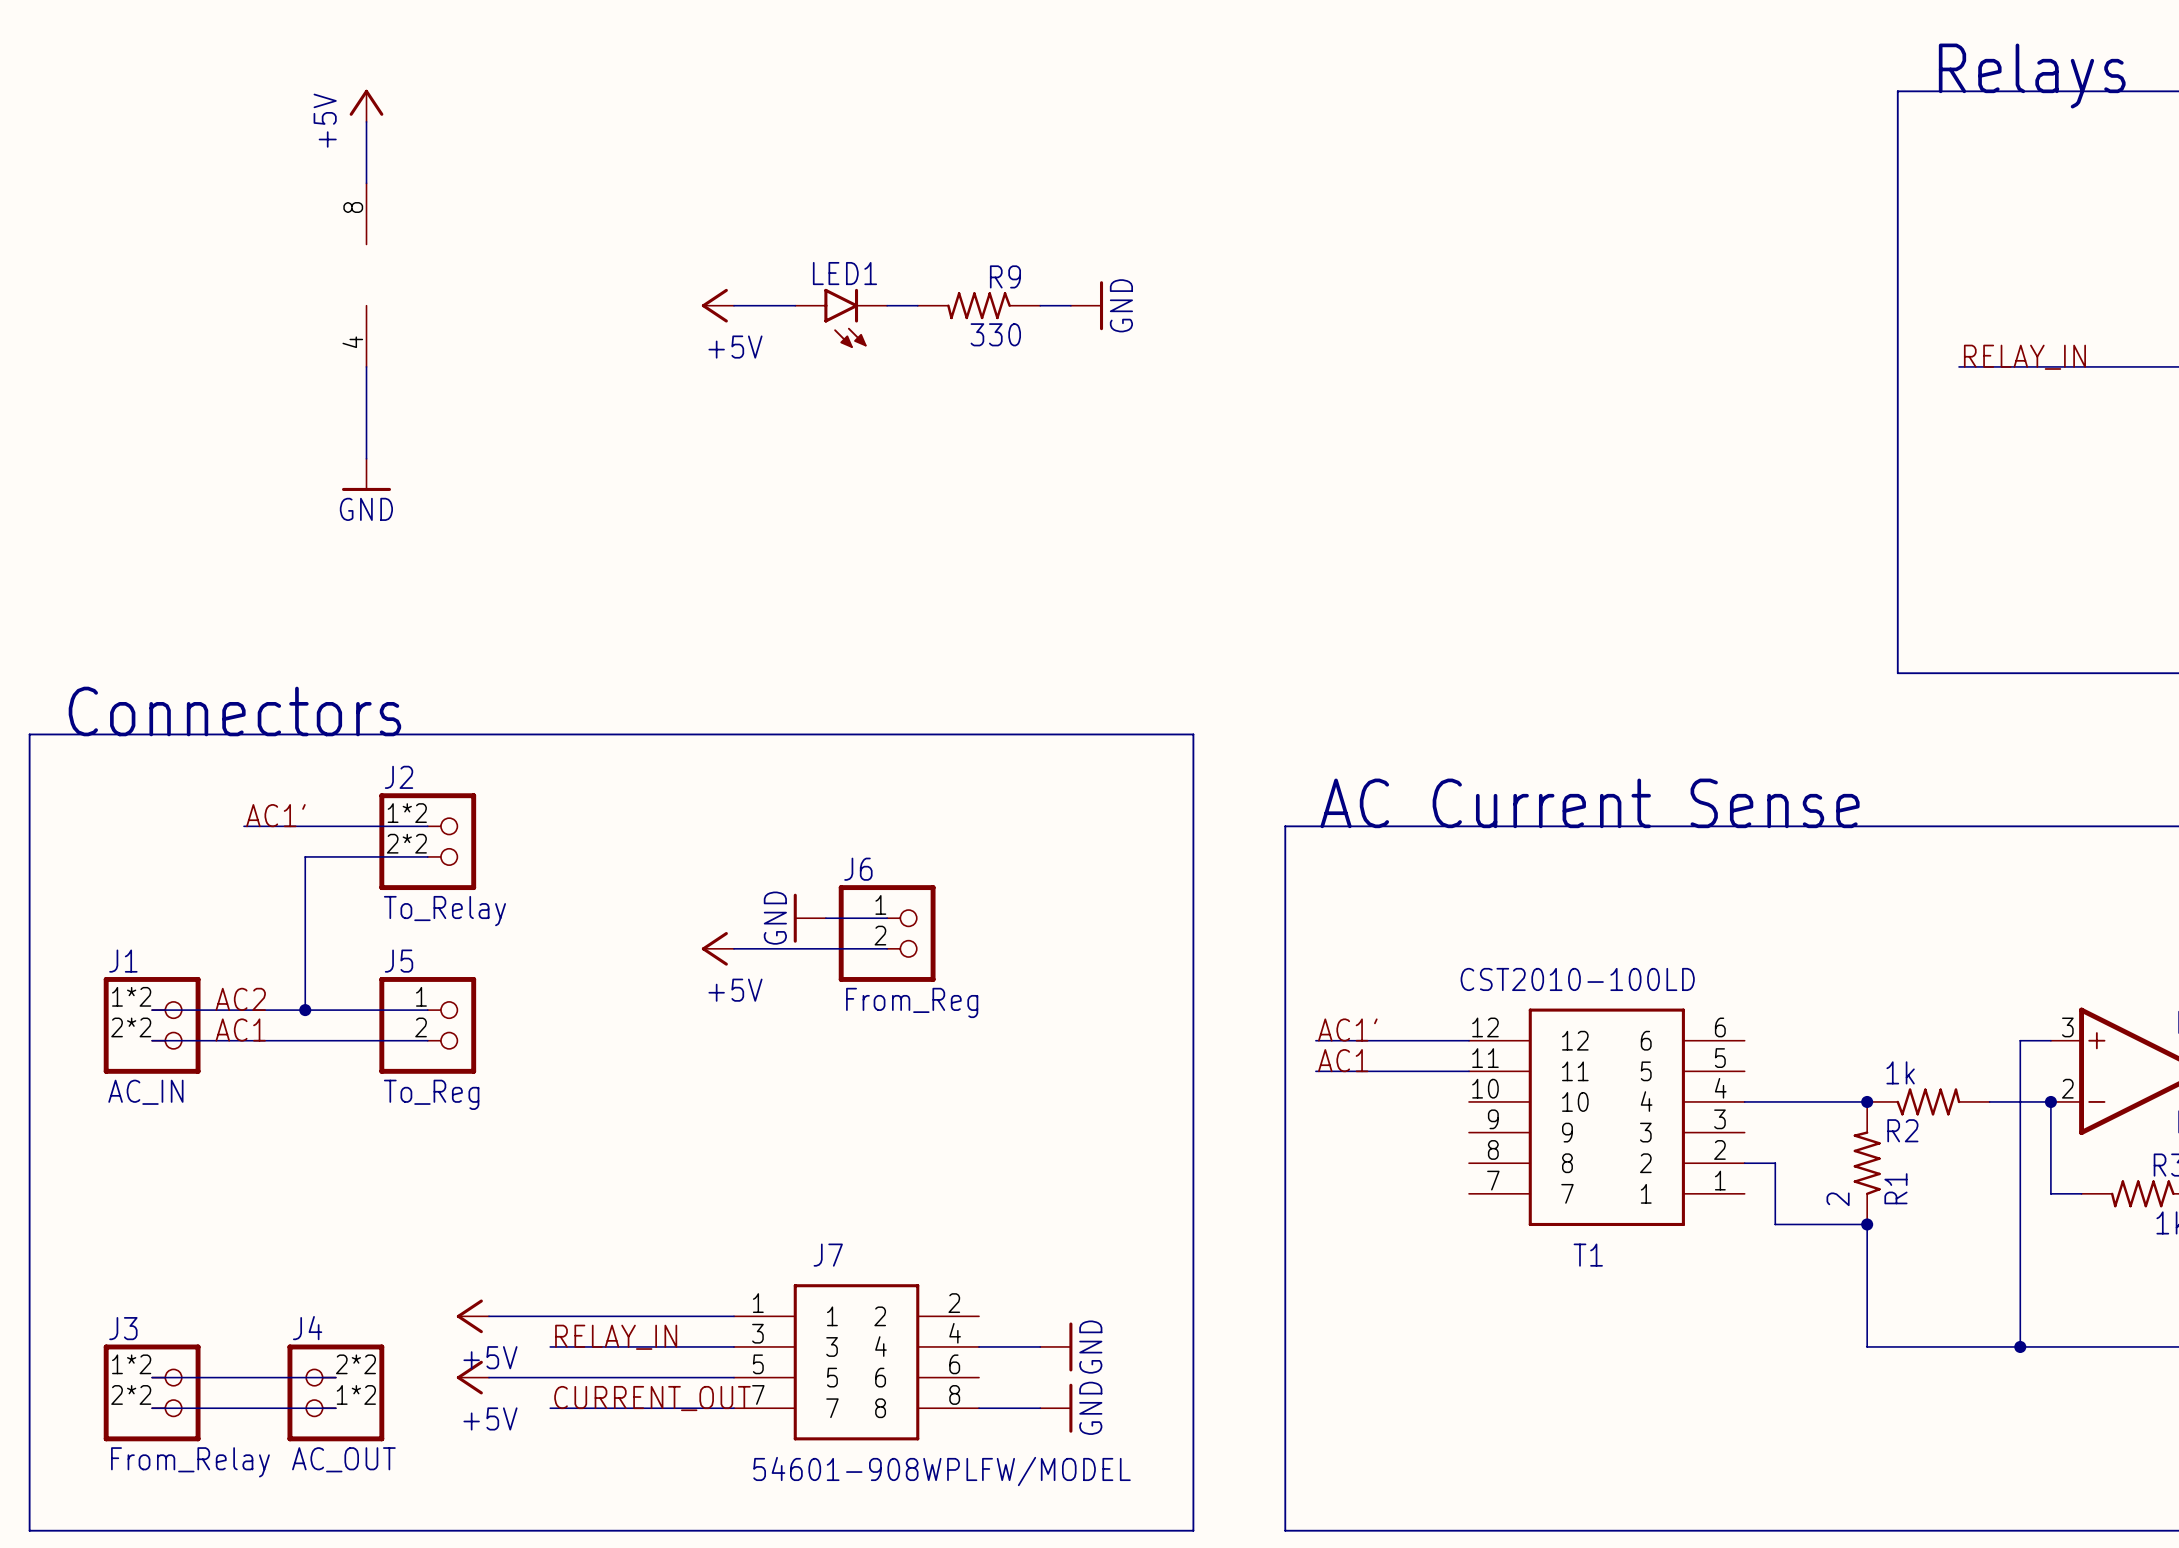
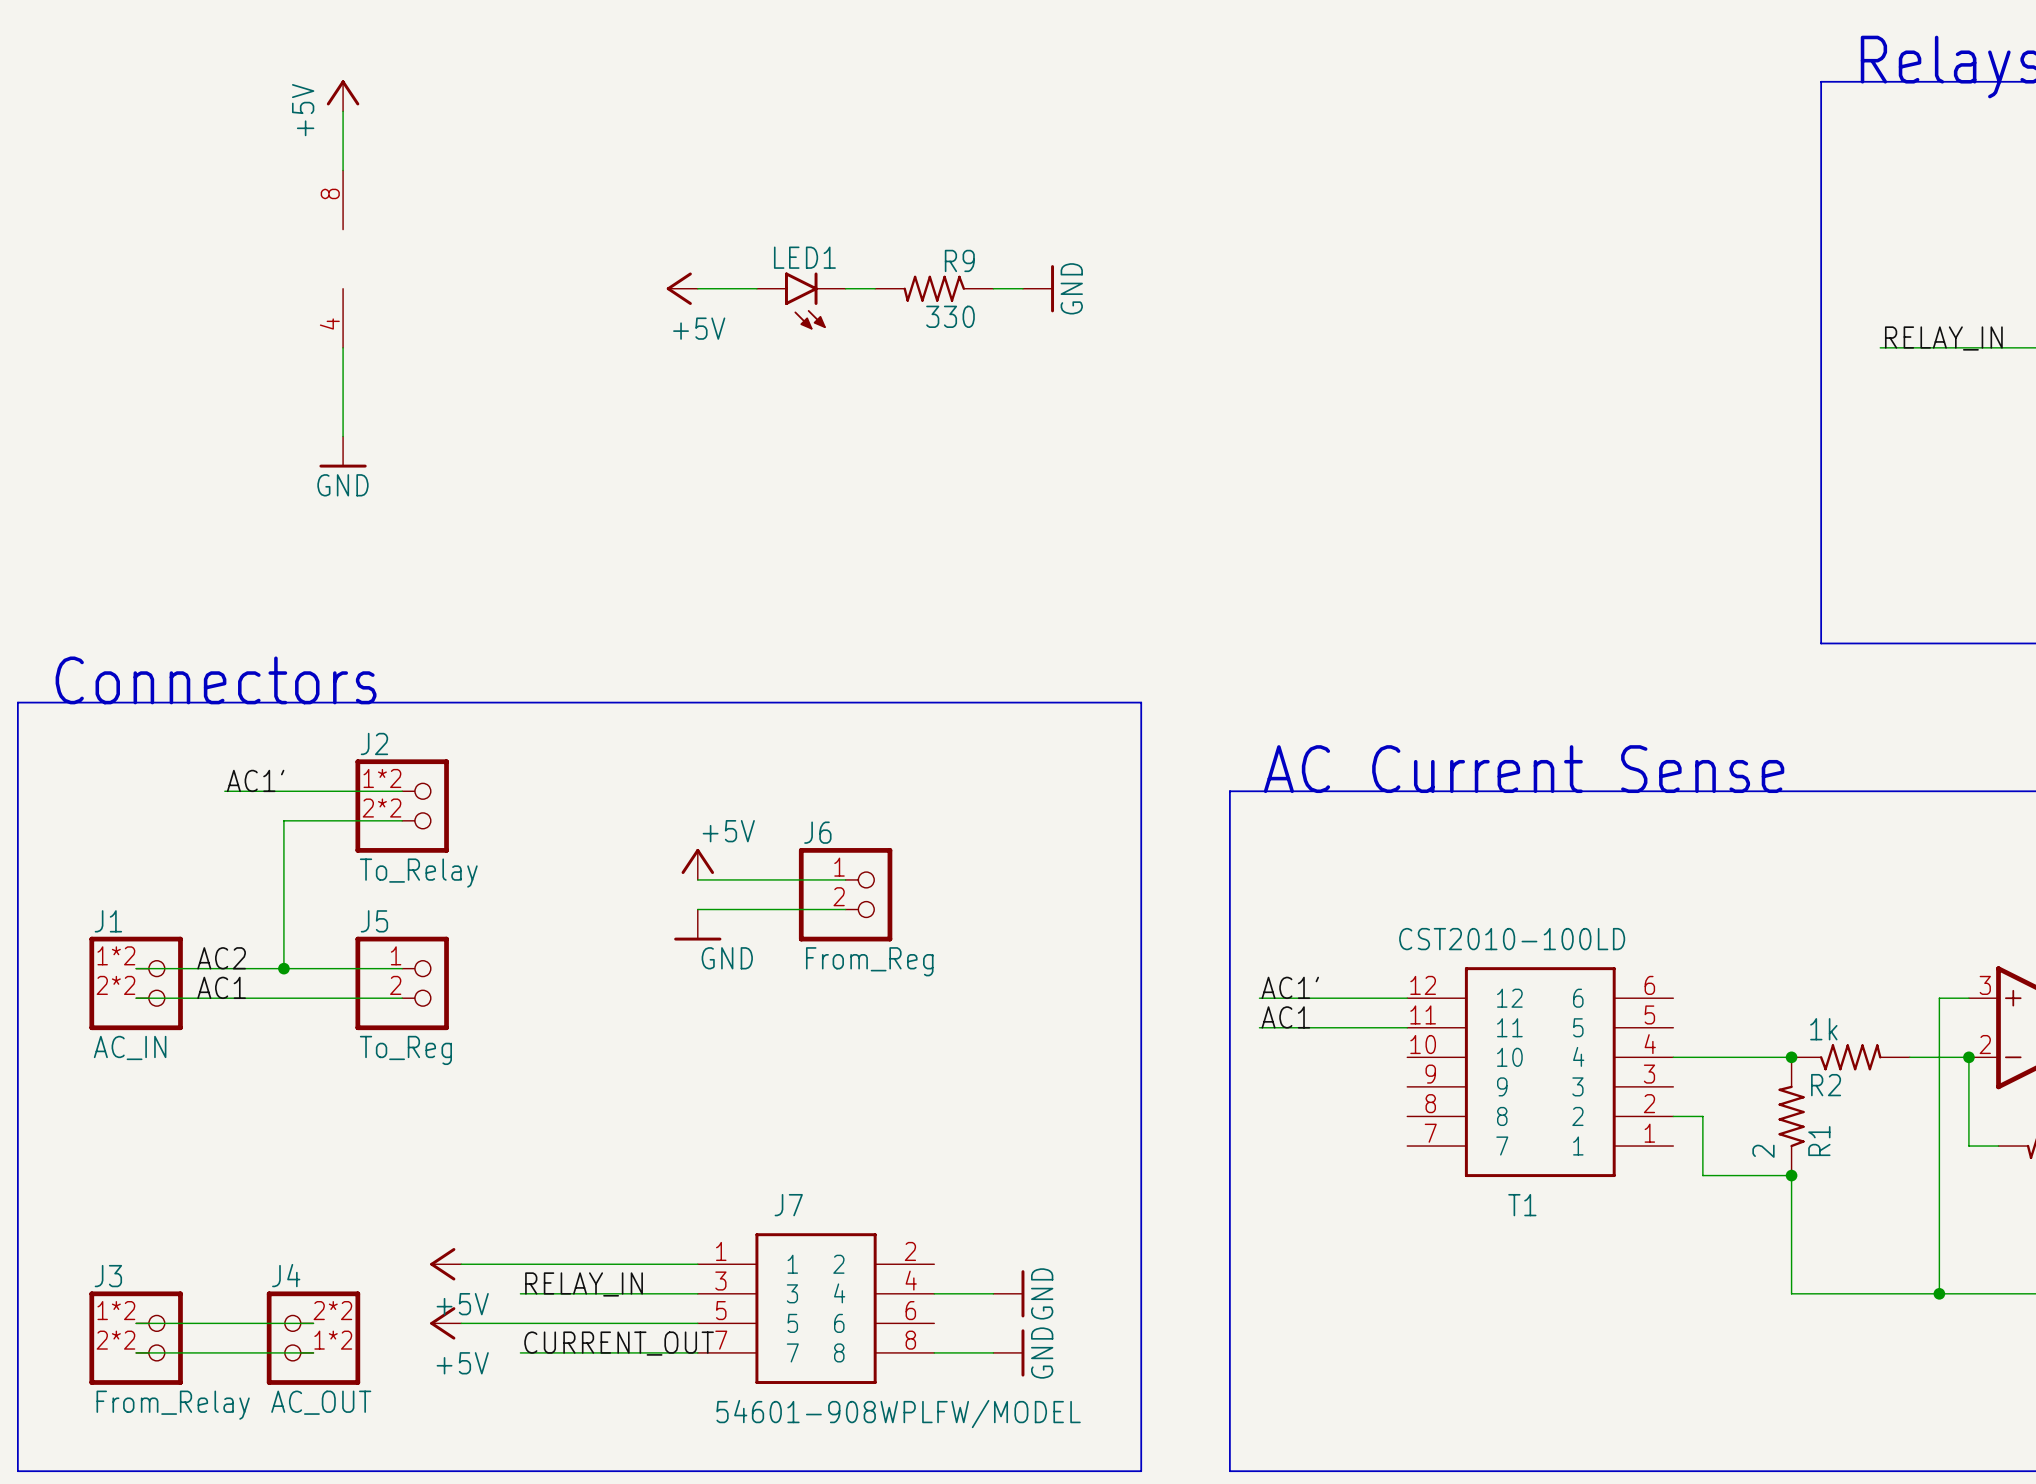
wire: none -> (697, 879) (786, 879)
power symbol text position: GND (775, 918) -> GND (727, 958)
power symbol rotation: 0° (795, 918) -> 90° counterclockwise (697, 939)
power symbol position: GND (809, 918) -> GND (697, 925)
power symbol rotation: 0° (714, 948) -> 90° clockwise (697, 861)
power symbol position: +5V (717, 948) -> +5V (697, 864)
power symbol text position: +5V (735, 990) -> +5V (728, 831)

